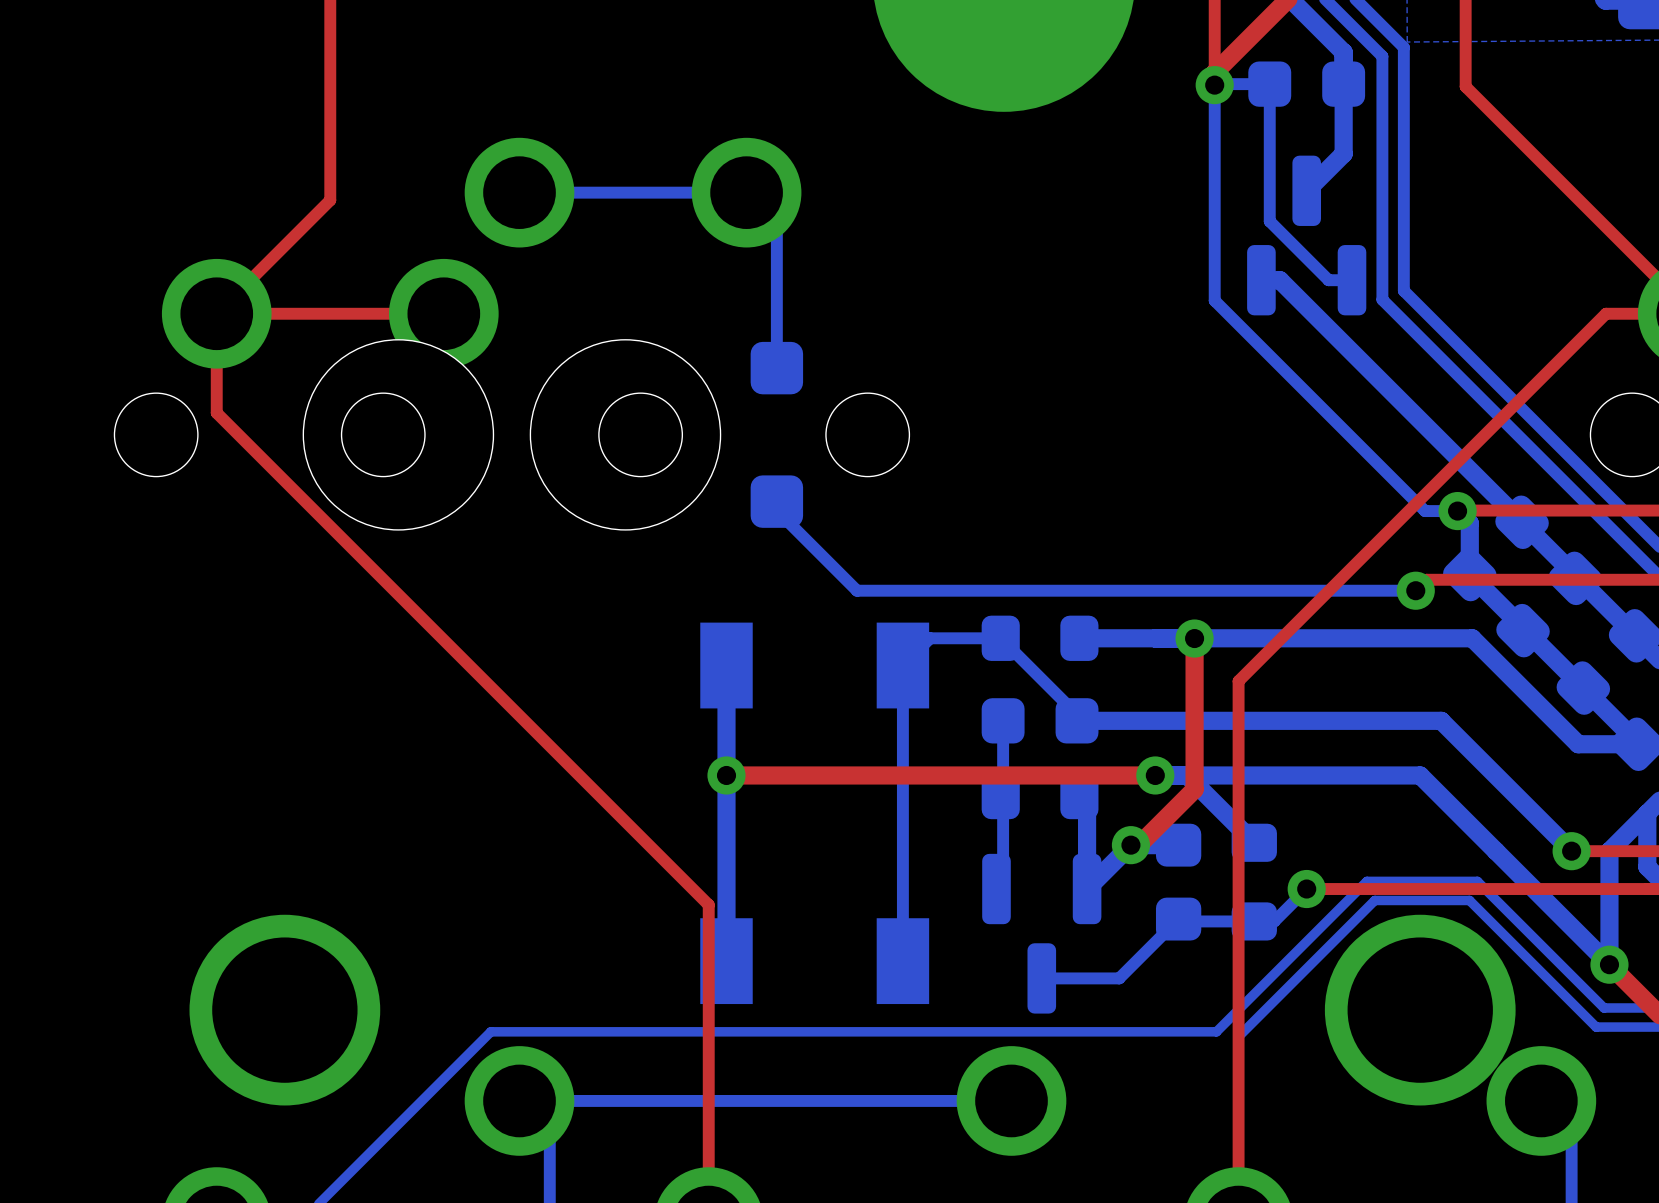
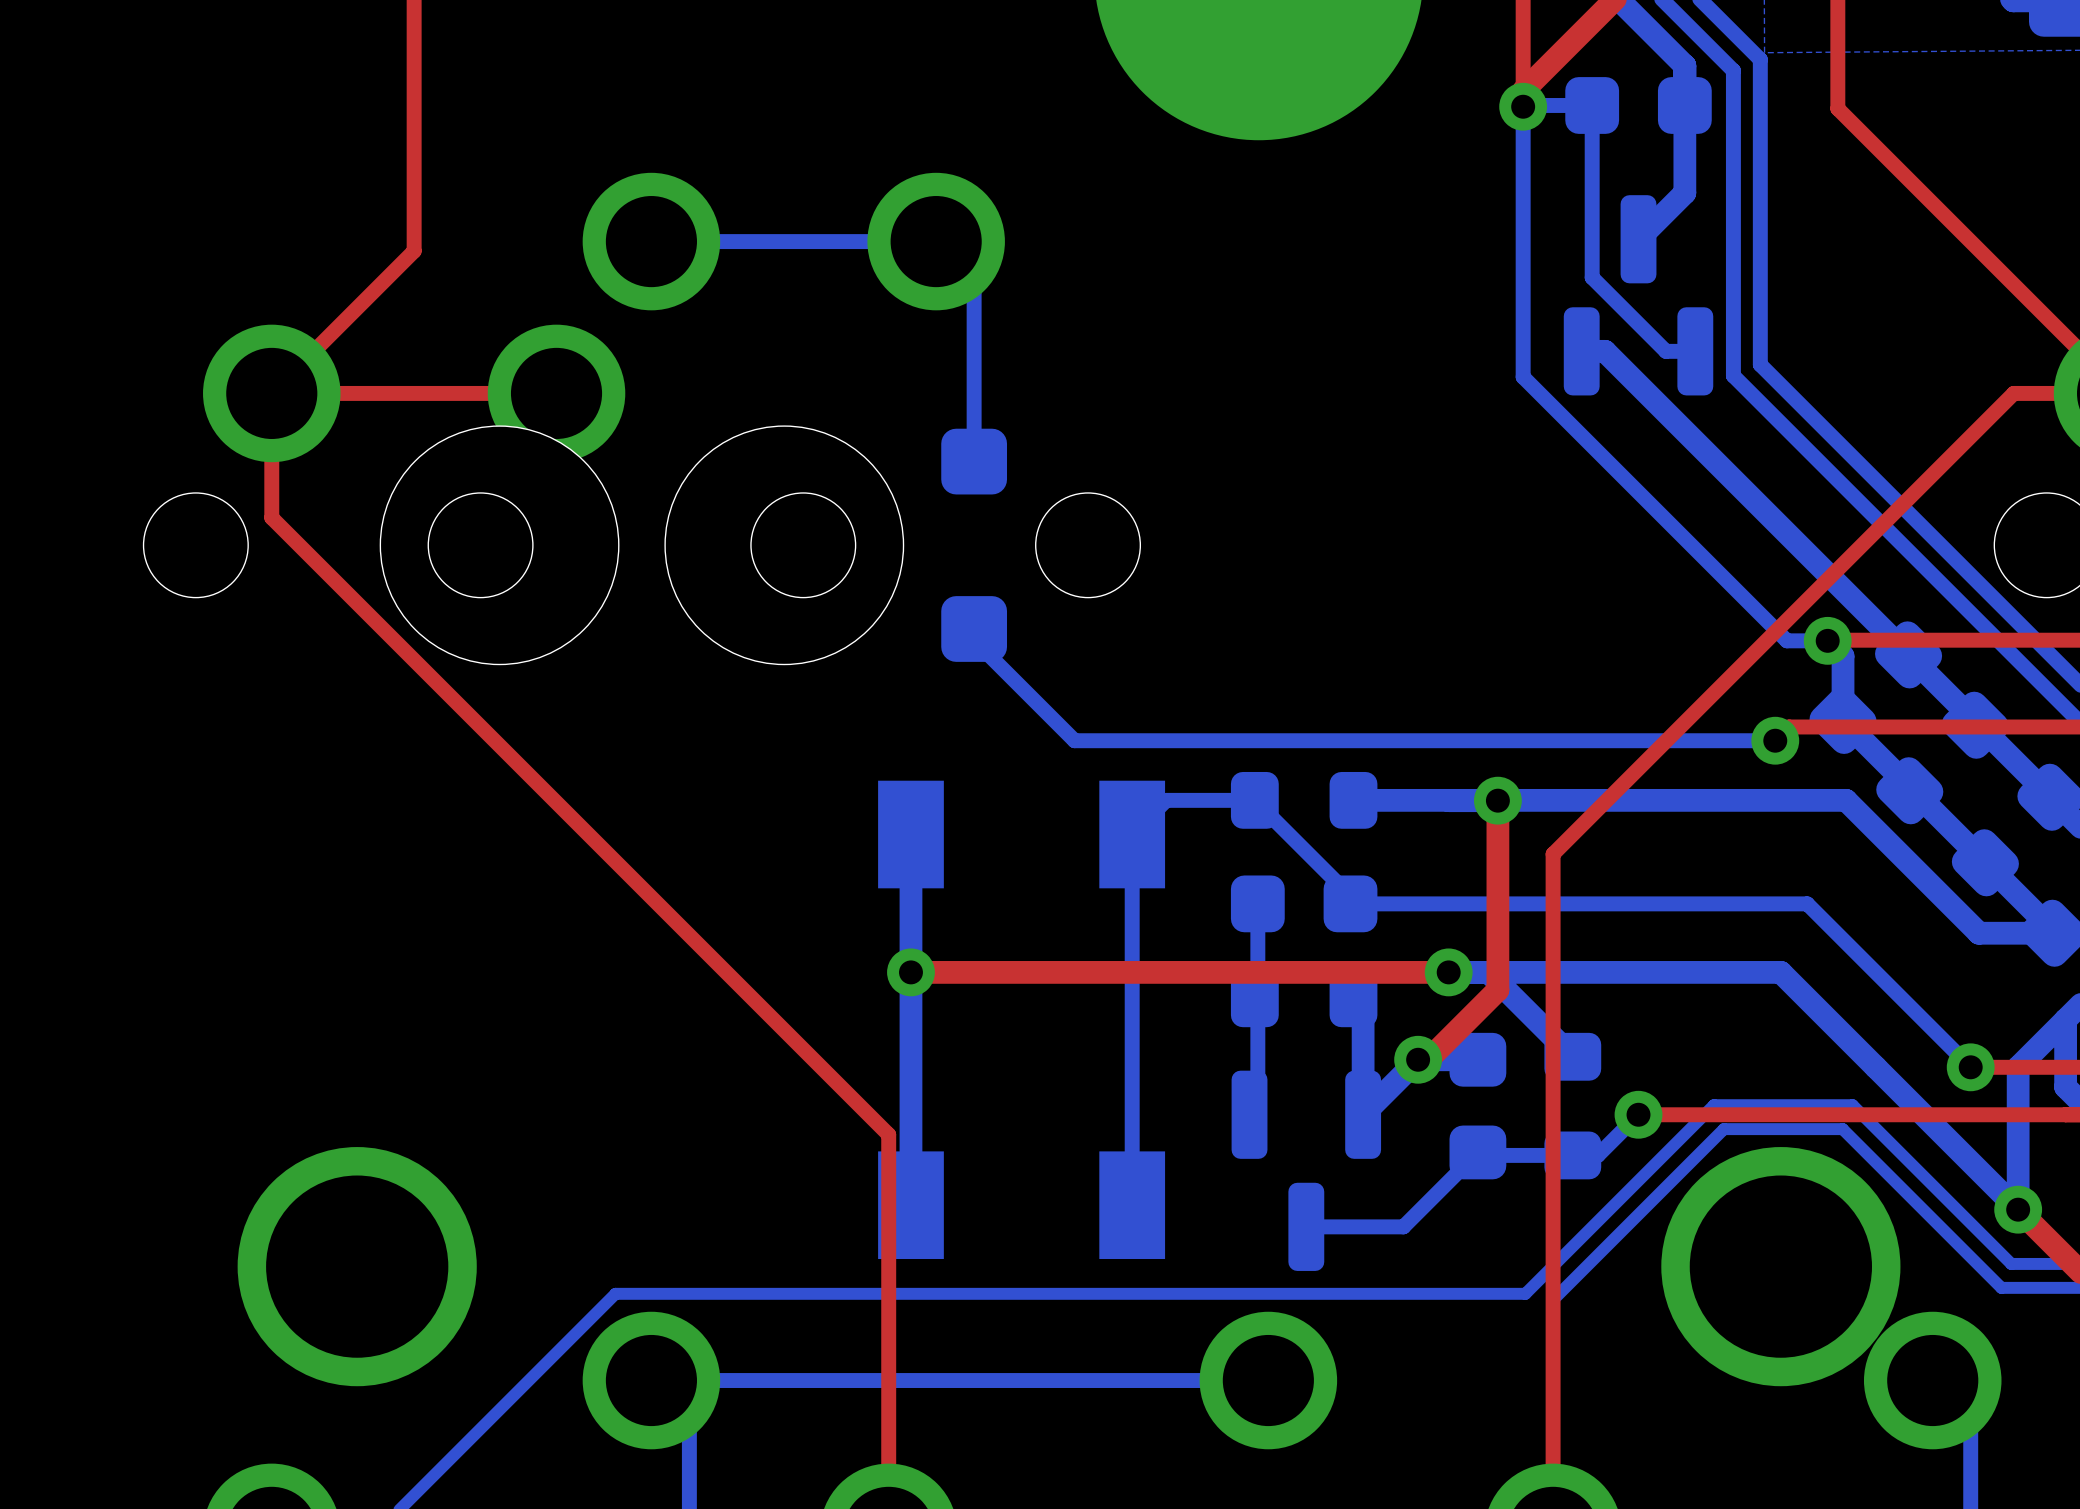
bottom track width: thick (1077, 720) (1441, 720) (1571, 851) -> thin (1350, 903) (1807, 903) (1970, 1067)

